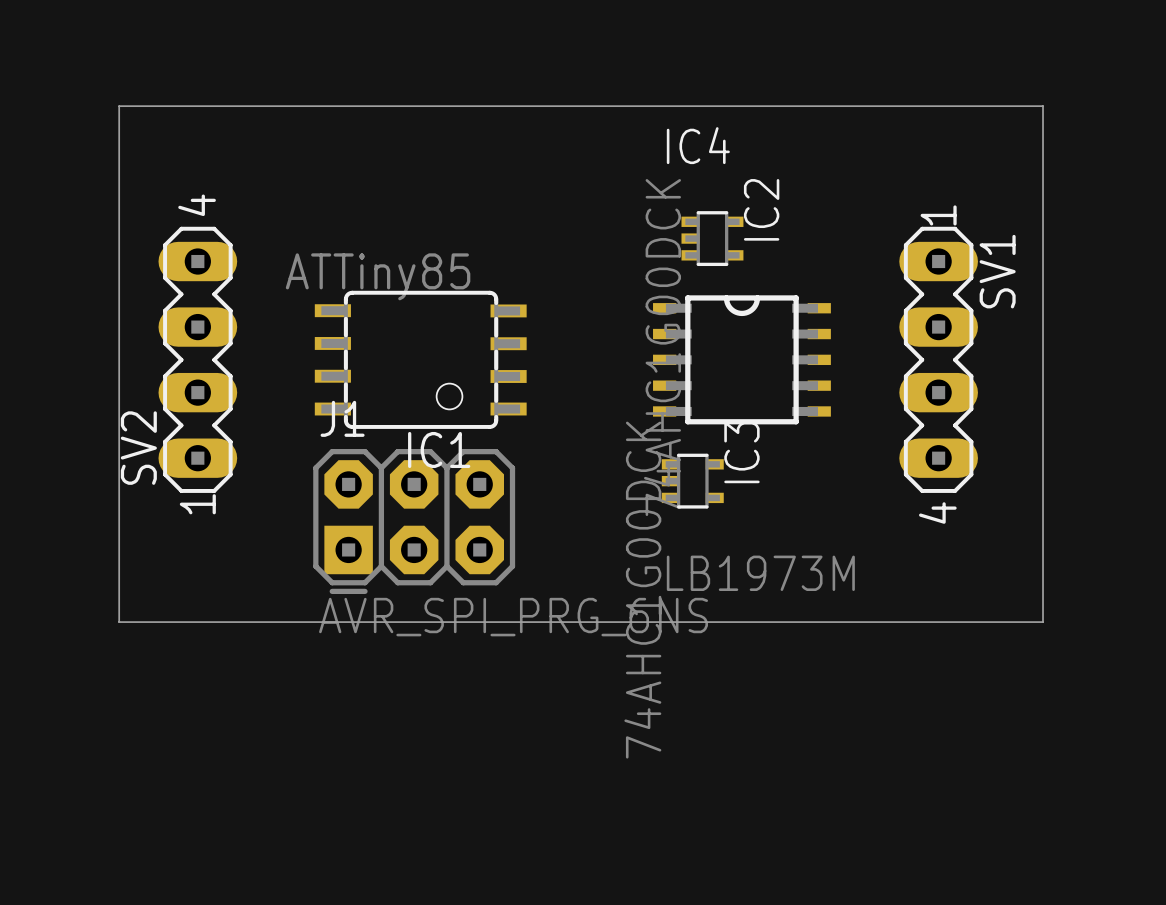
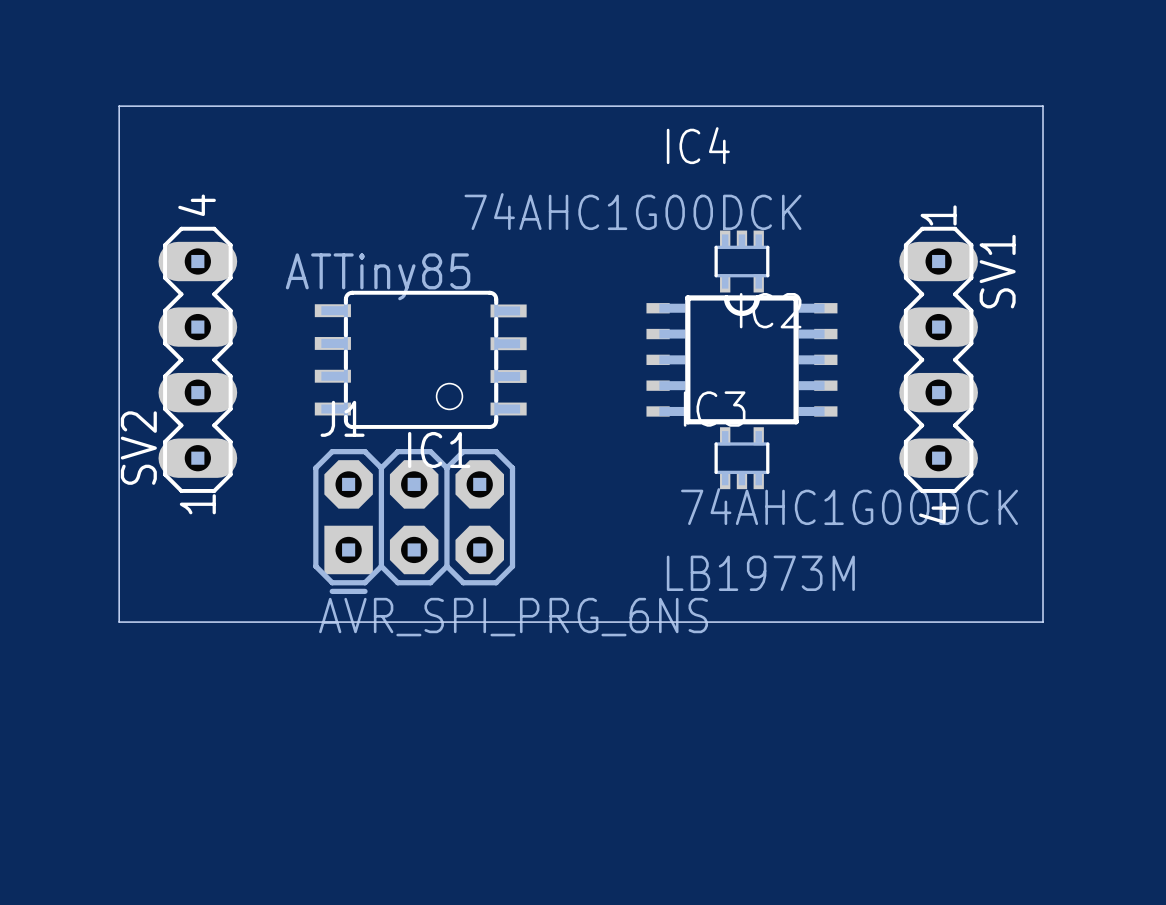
IC2 rotation: 0° (712, 238) -> 90° clockwise (741, 261)
IC2 position: (712, 238) -> (741, 261)
IC4 footprint: [653, 295, 831, 425] -> [646, 295, 838, 425]
IC3 rotation: 0° (692, 481) -> 90° counterclockwise (741, 458)
IC3 position: (692, 481) -> (741, 458)

